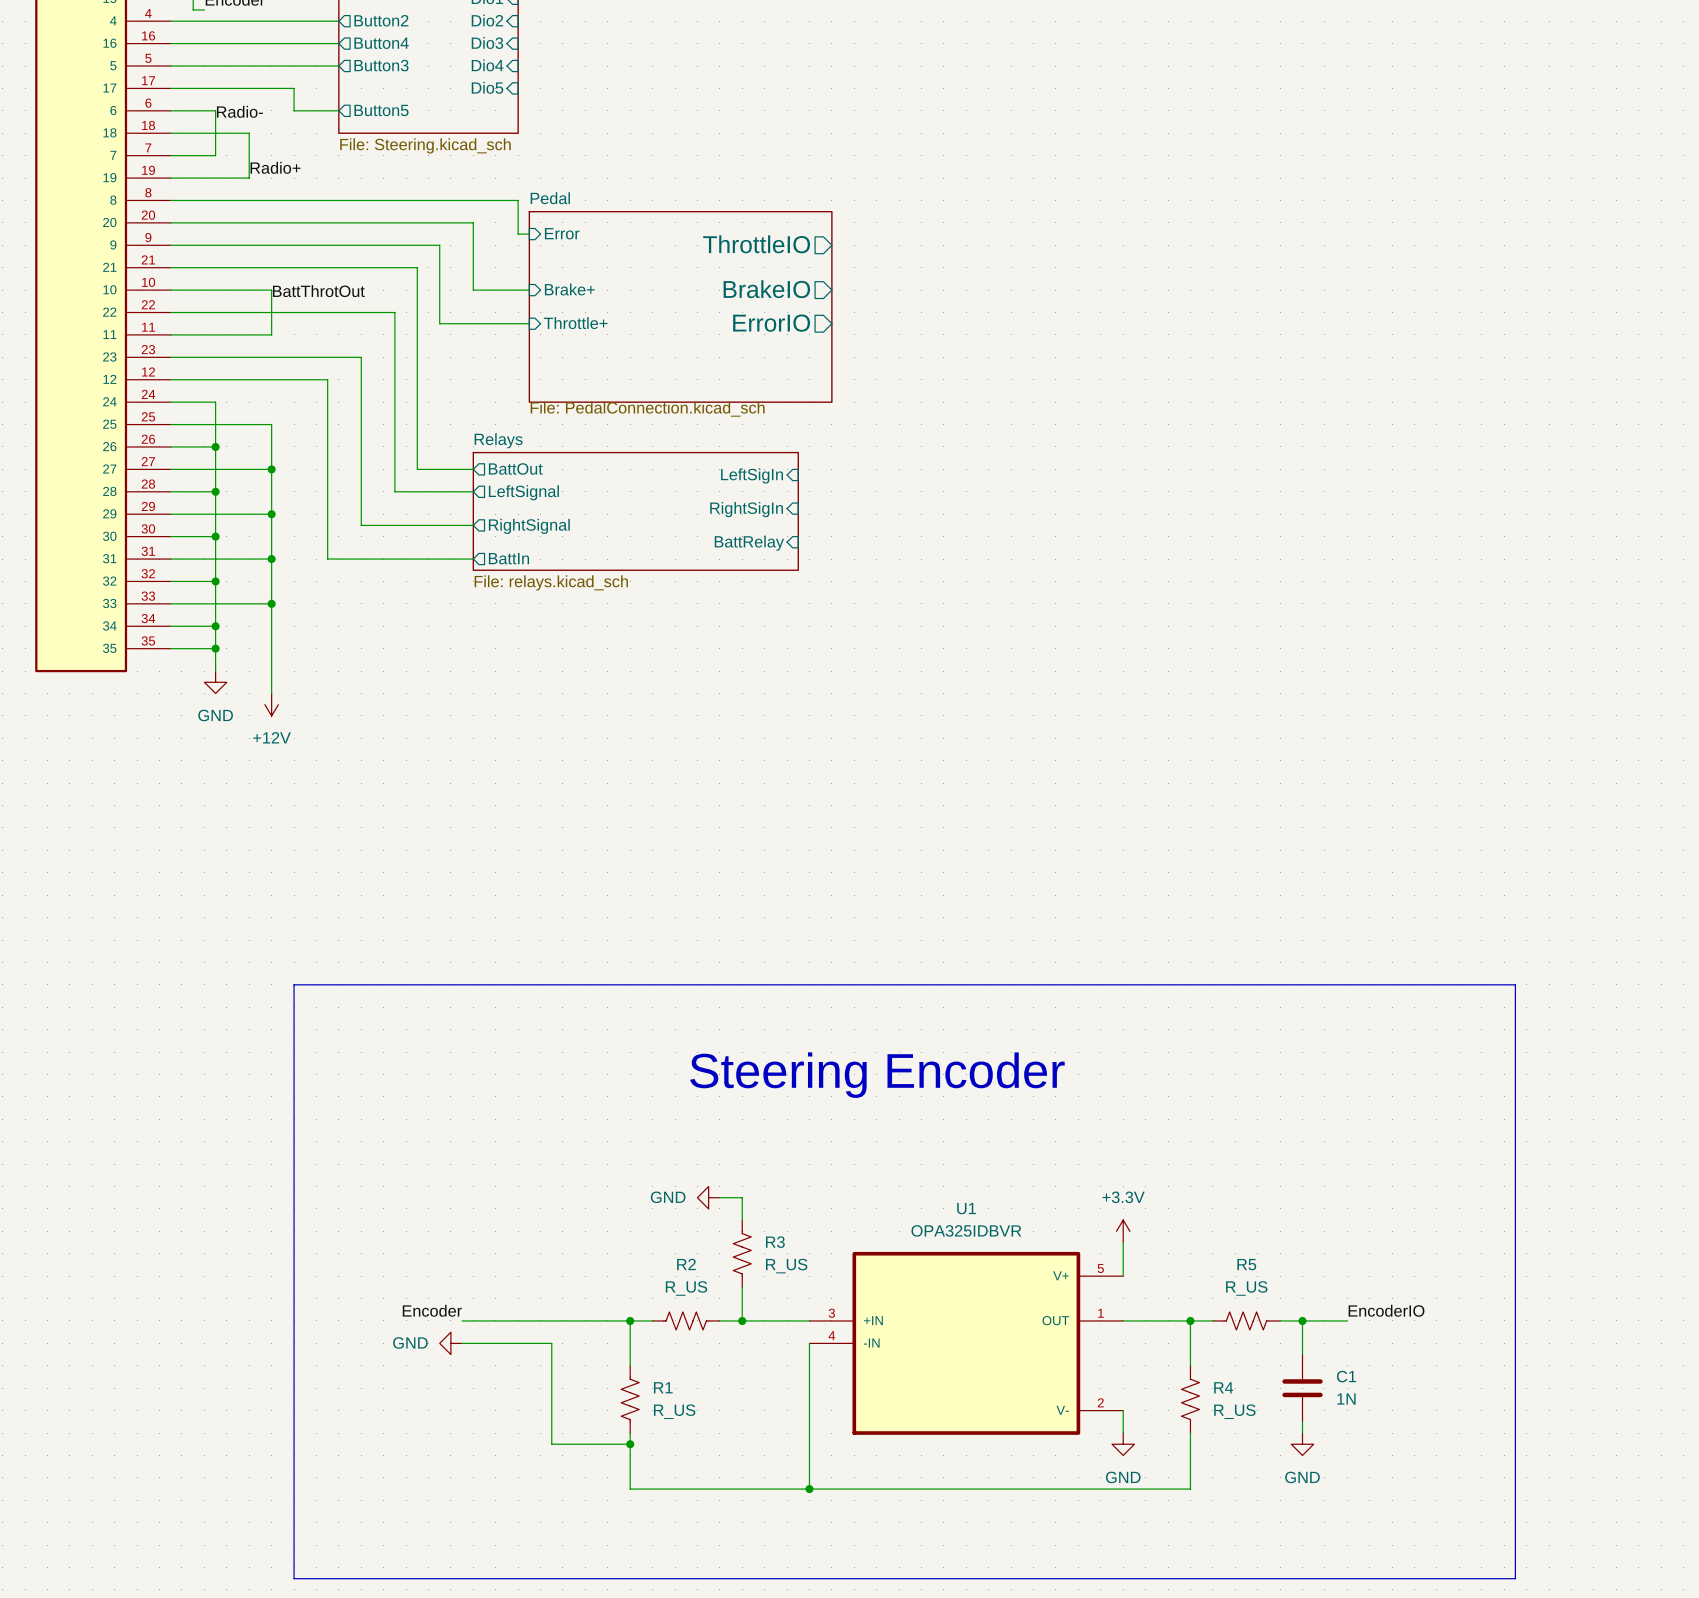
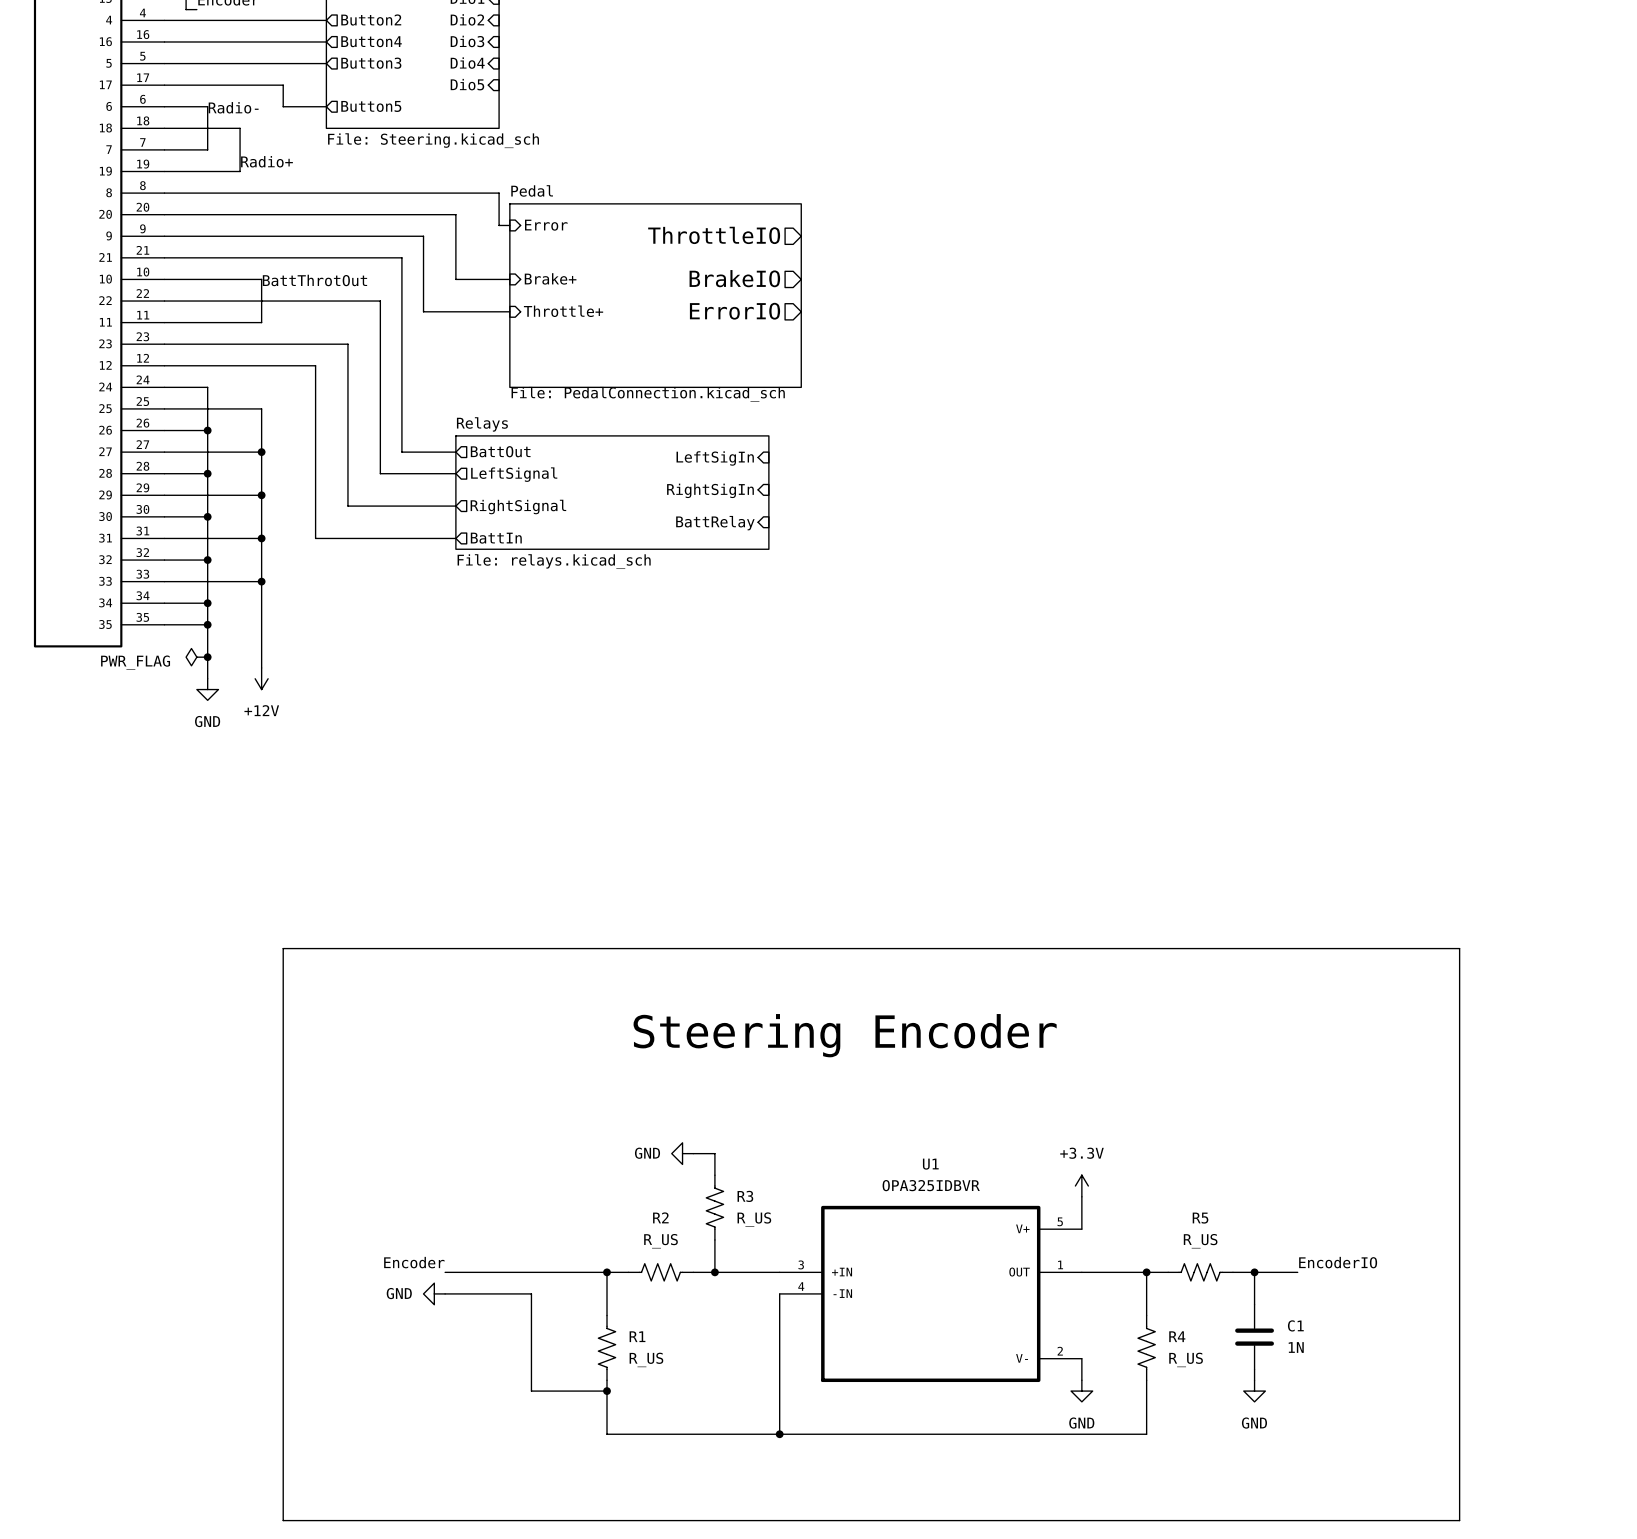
wire: none -> (207, 646) (207, 678)
power symbol: none -> PWR_FLAG (196, 657)
power symbol position: GND (215, 682) -> GND (207, 689)
junction: none -> (207, 657)

